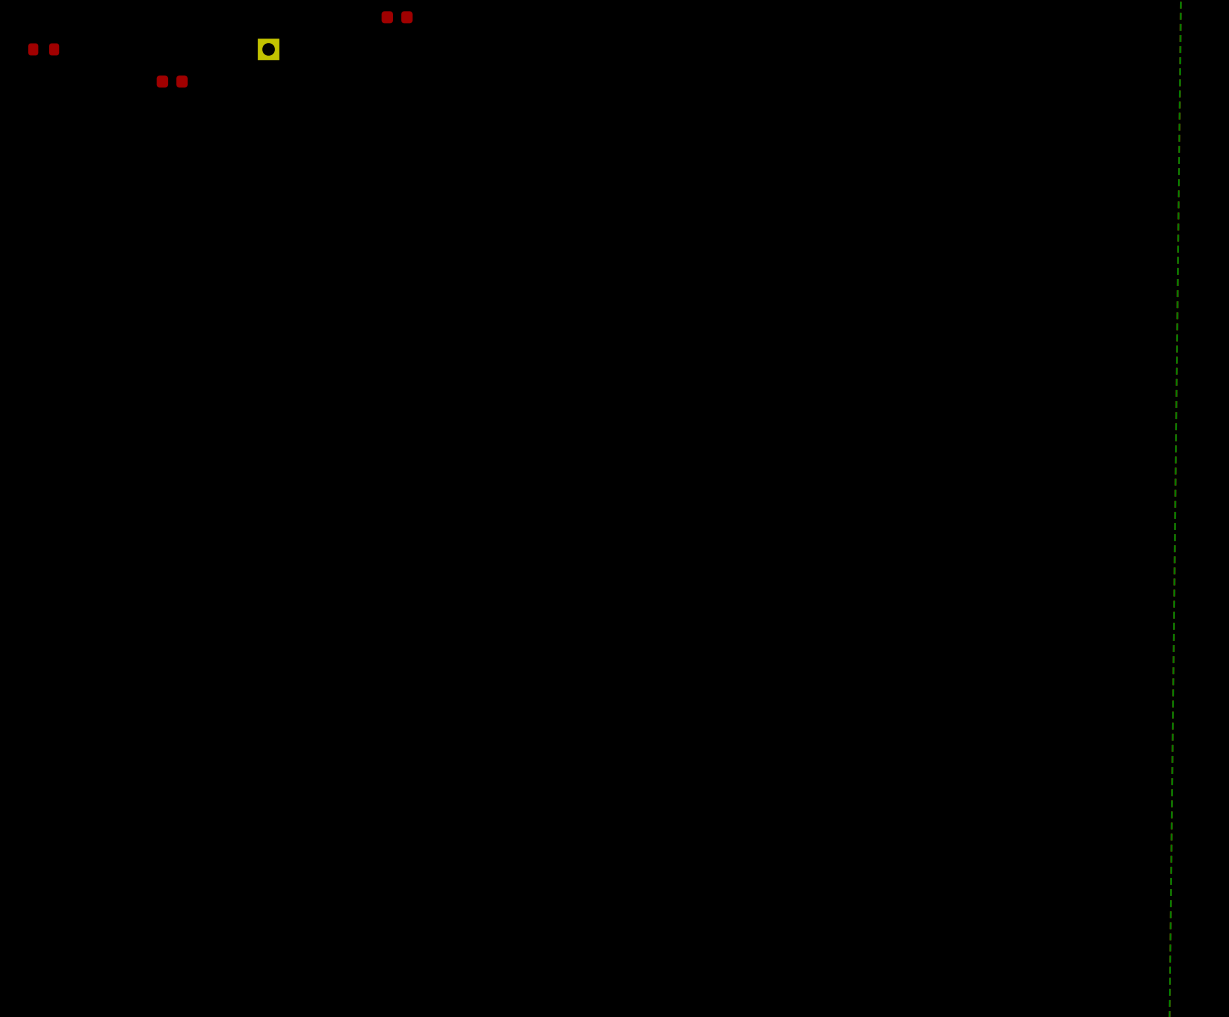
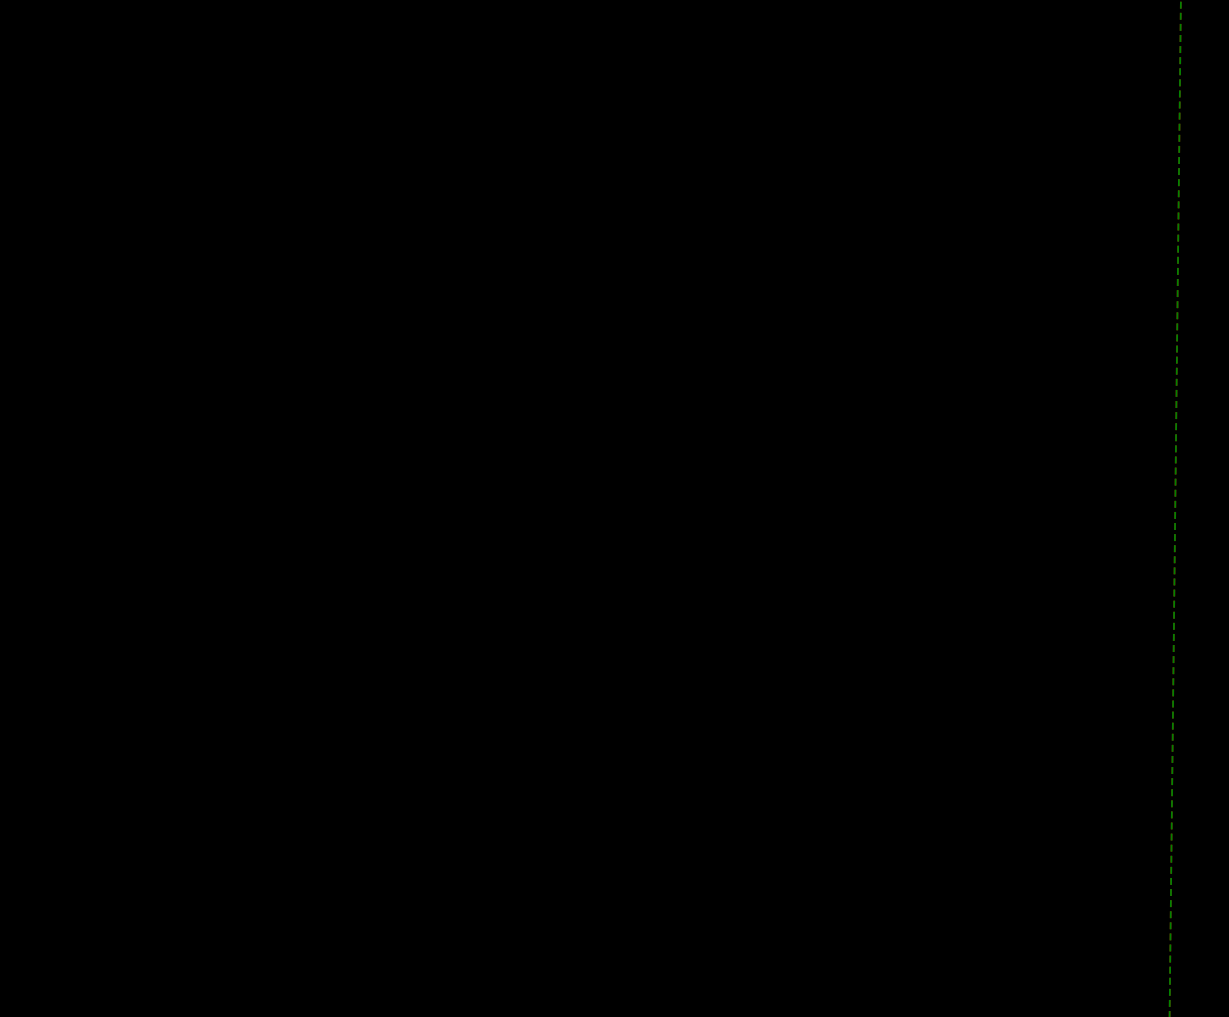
part: (397, 17) -> none
part: (43, 49) -> none
part: (268, 49) -> none
part: (172, 81) -> none

